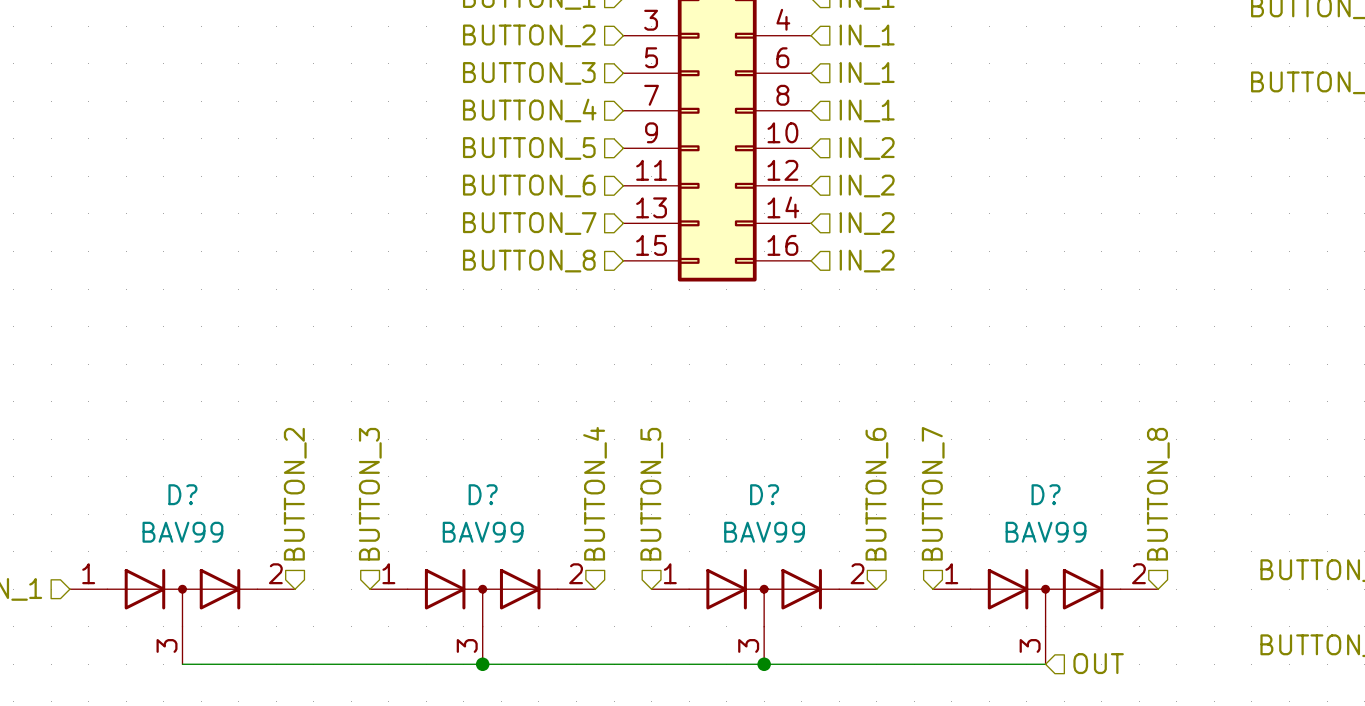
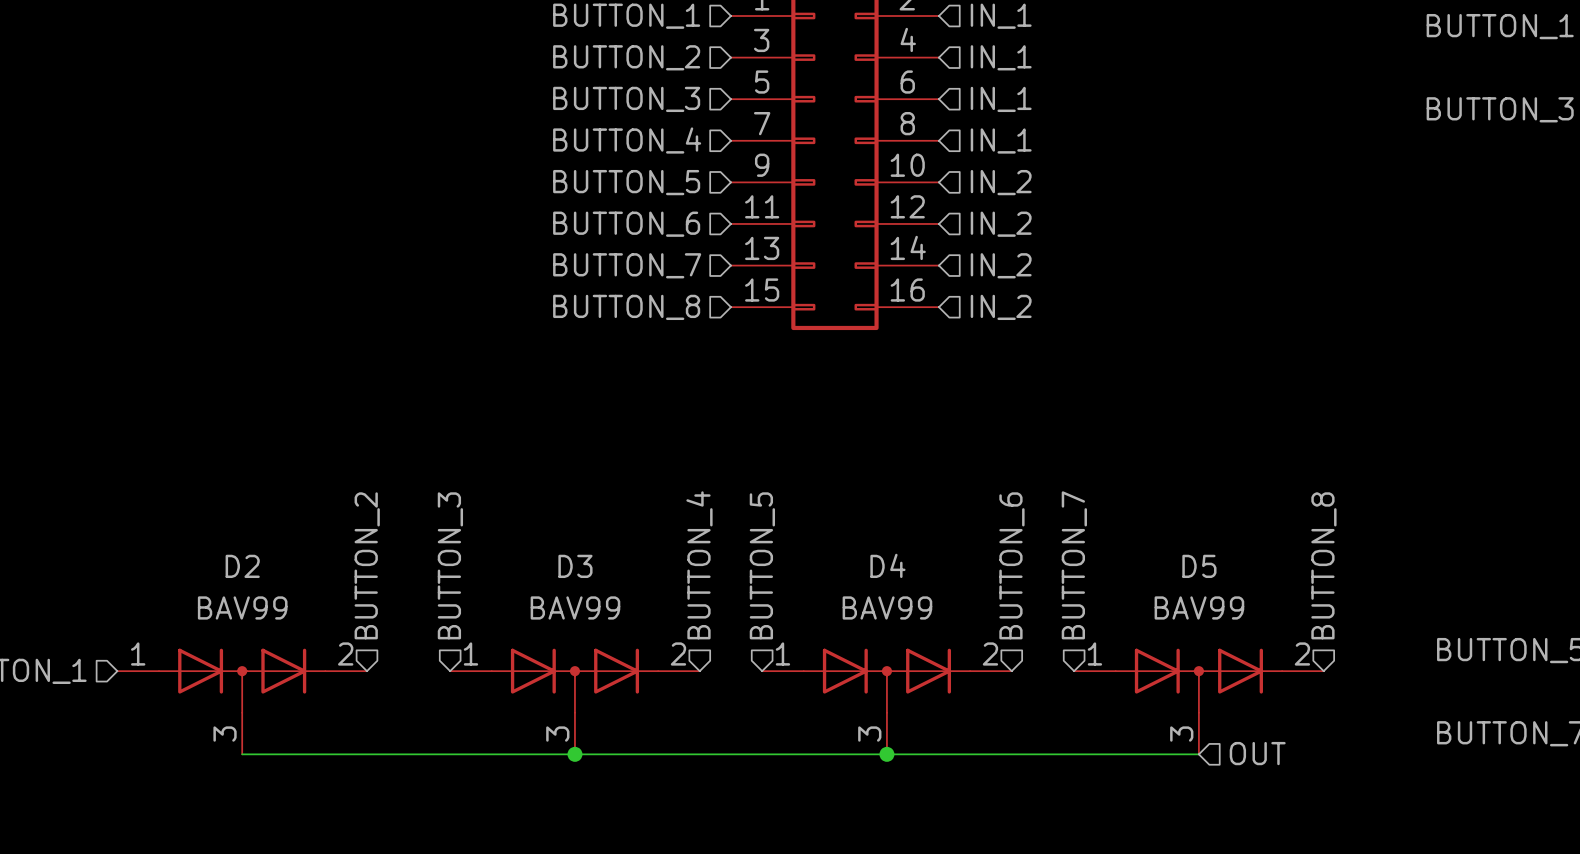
D? name: D? (182, 494) -> D2 (242, 566)
D? name: D? (483, 494) -> D3 (575, 566)
D? name: D? (764, 494) -> D4 (887, 565)
D? name: D? (1046, 494) -> D5 (1199, 566)

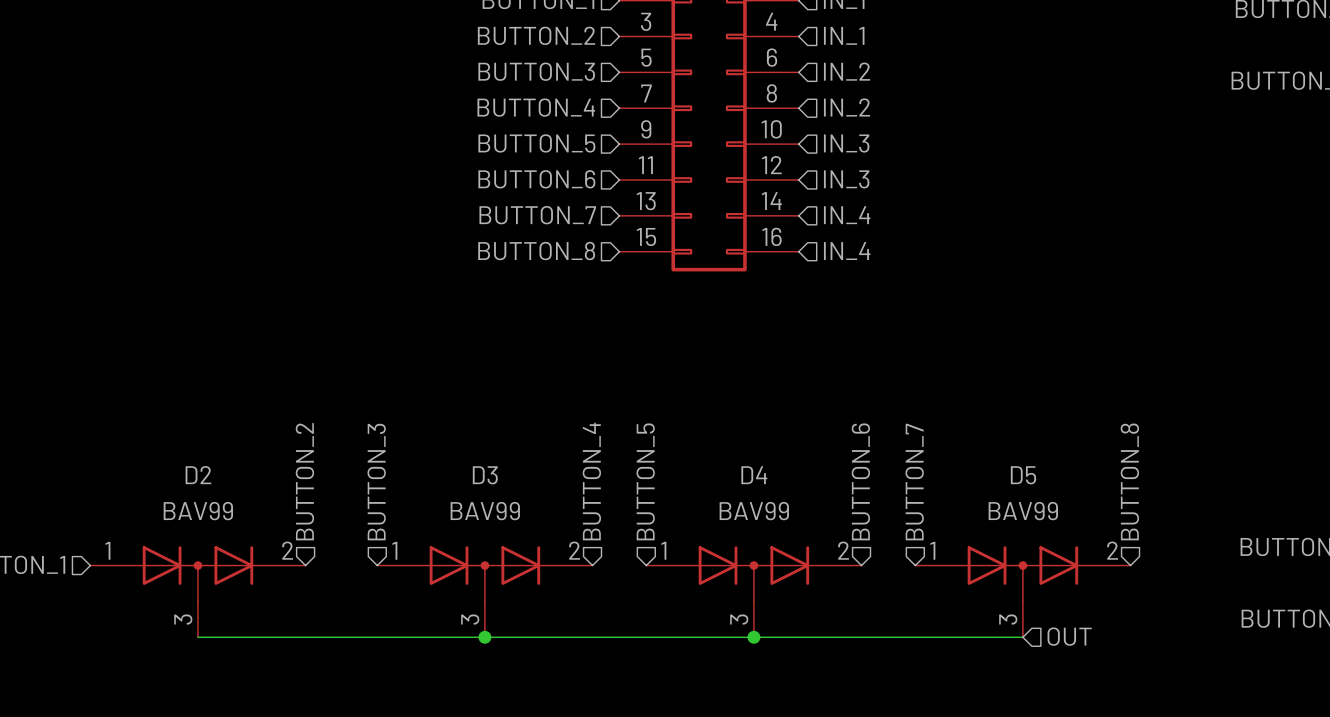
hierarchical label: IN_1 (1001, 99) -> IN_2 (847, 71)
hierarchical label: IN_1 (1001, 141) -> IN_2 (847, 107)
hierarchical label: IN_2 (1001, 182) -> IN_3 (846, 143)
hierarchical label: IN_2 (1001, 224) -> IN_3 (846, 179)
hierarchical label: IN_2 (1001, 265) -> IN_4 (847, 215)
hierarchical label: IN_2 (1001, 307) -> IN_4 (847, 251)

